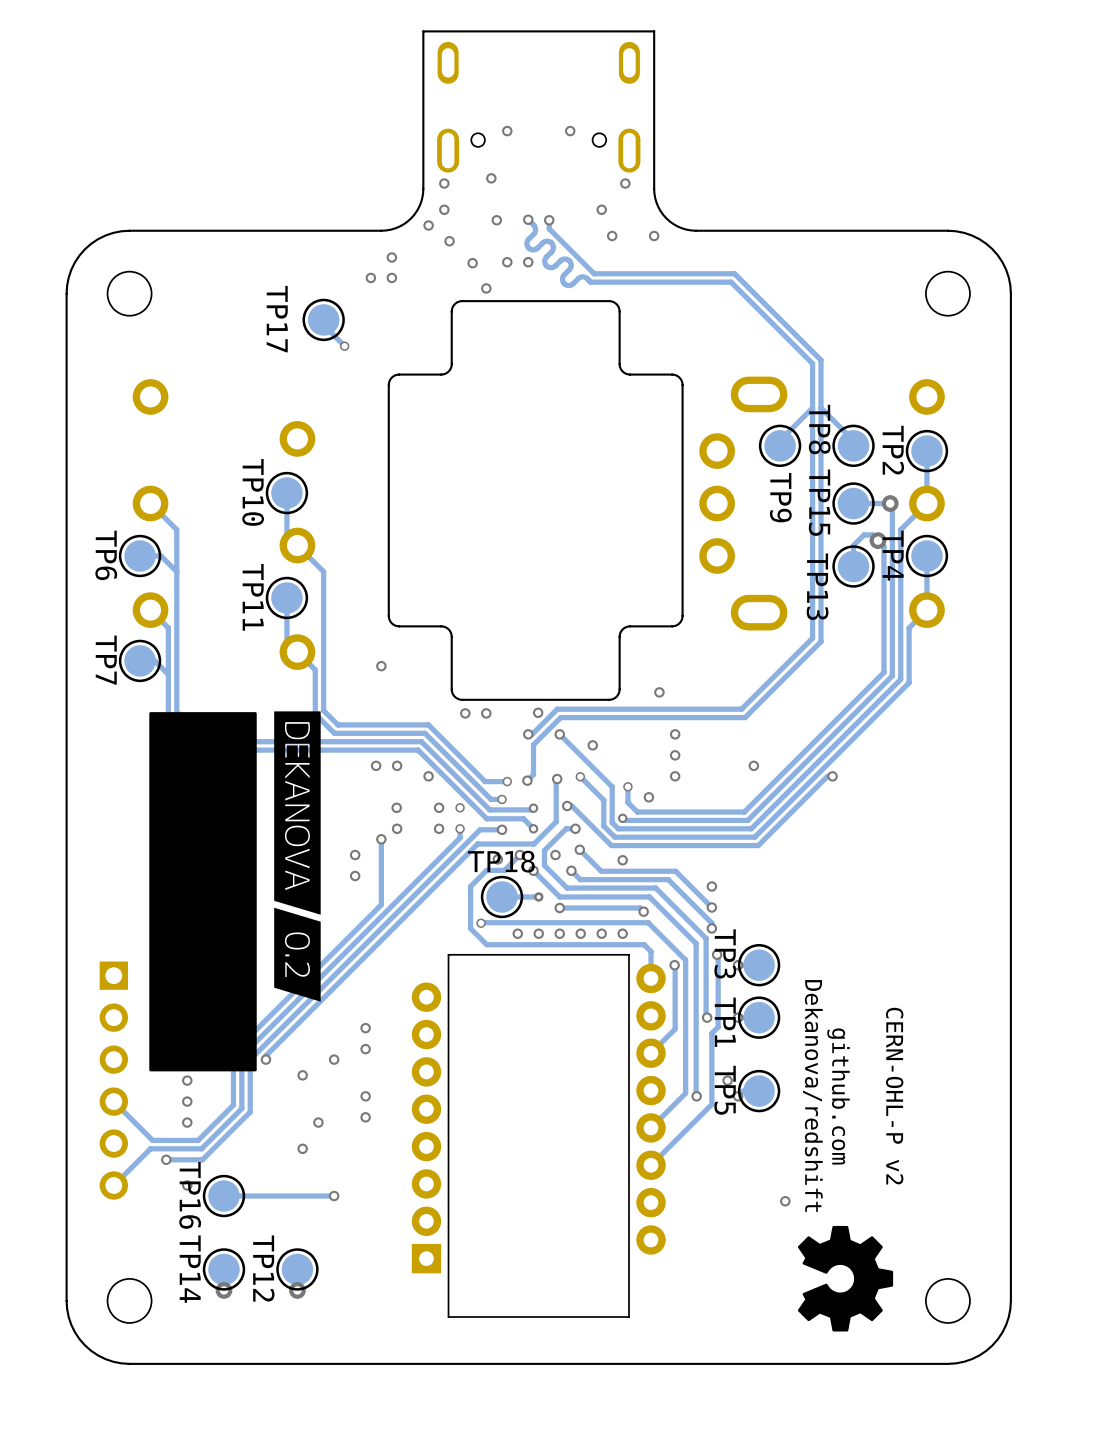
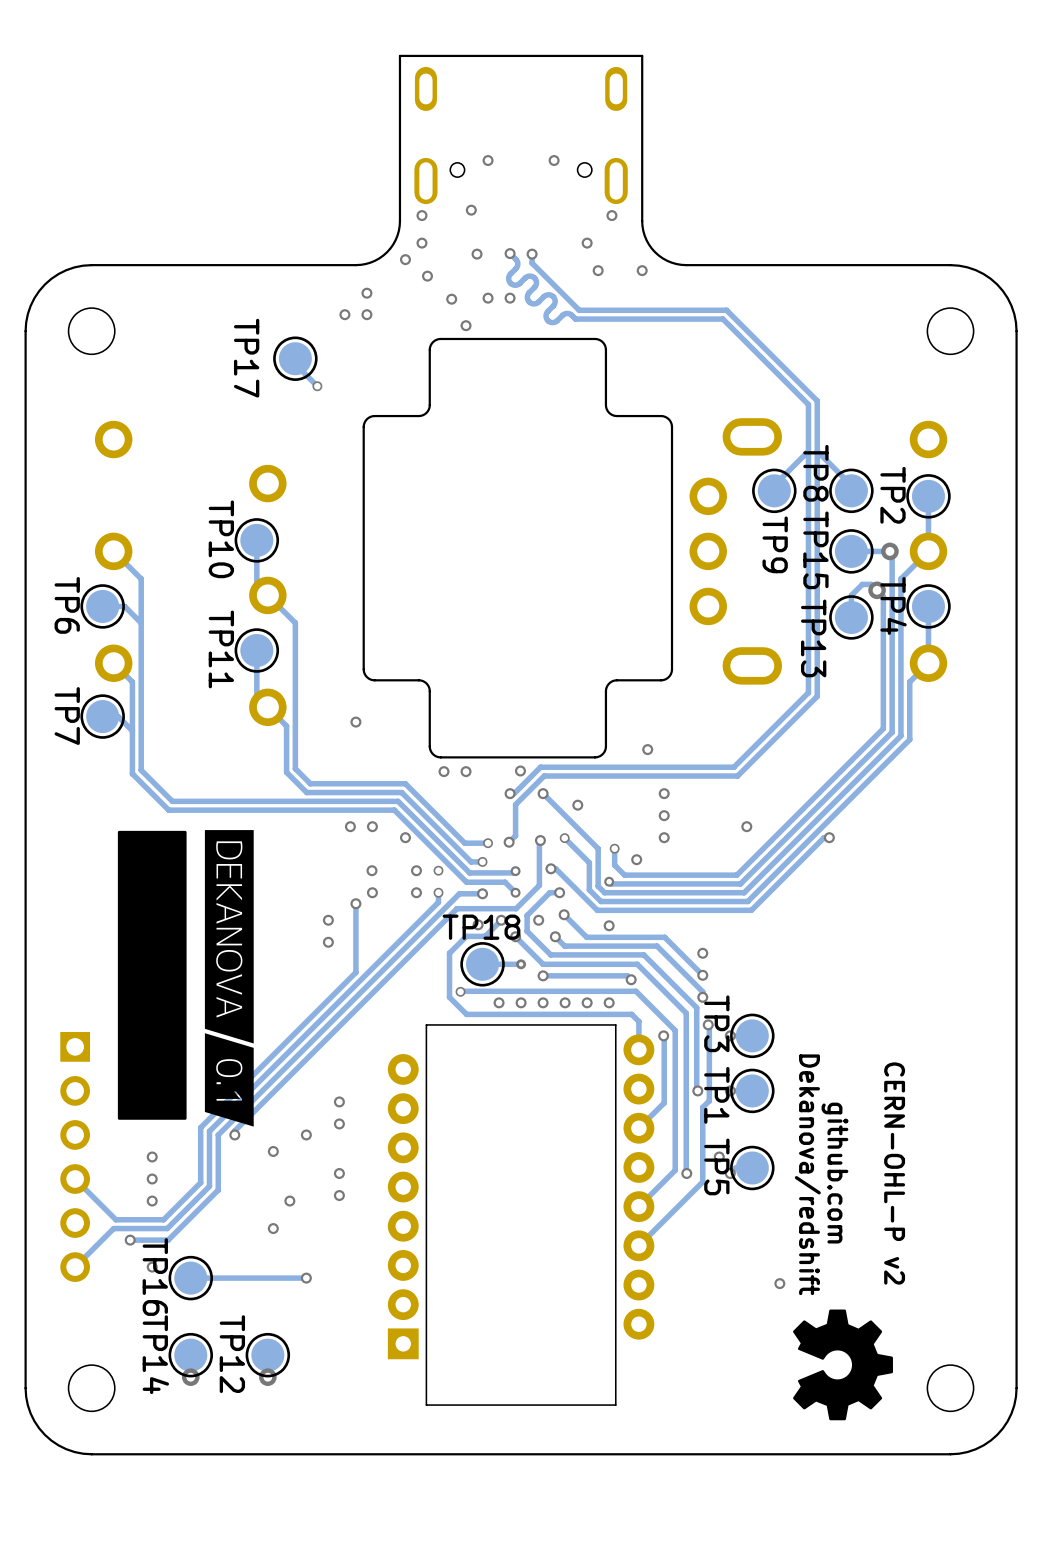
drawing: [149, 712, 321, 1072] -> none
drawing: none -> [117, 830, 254, 1127]
drawing position: (297, 813) -> (229, 936)

